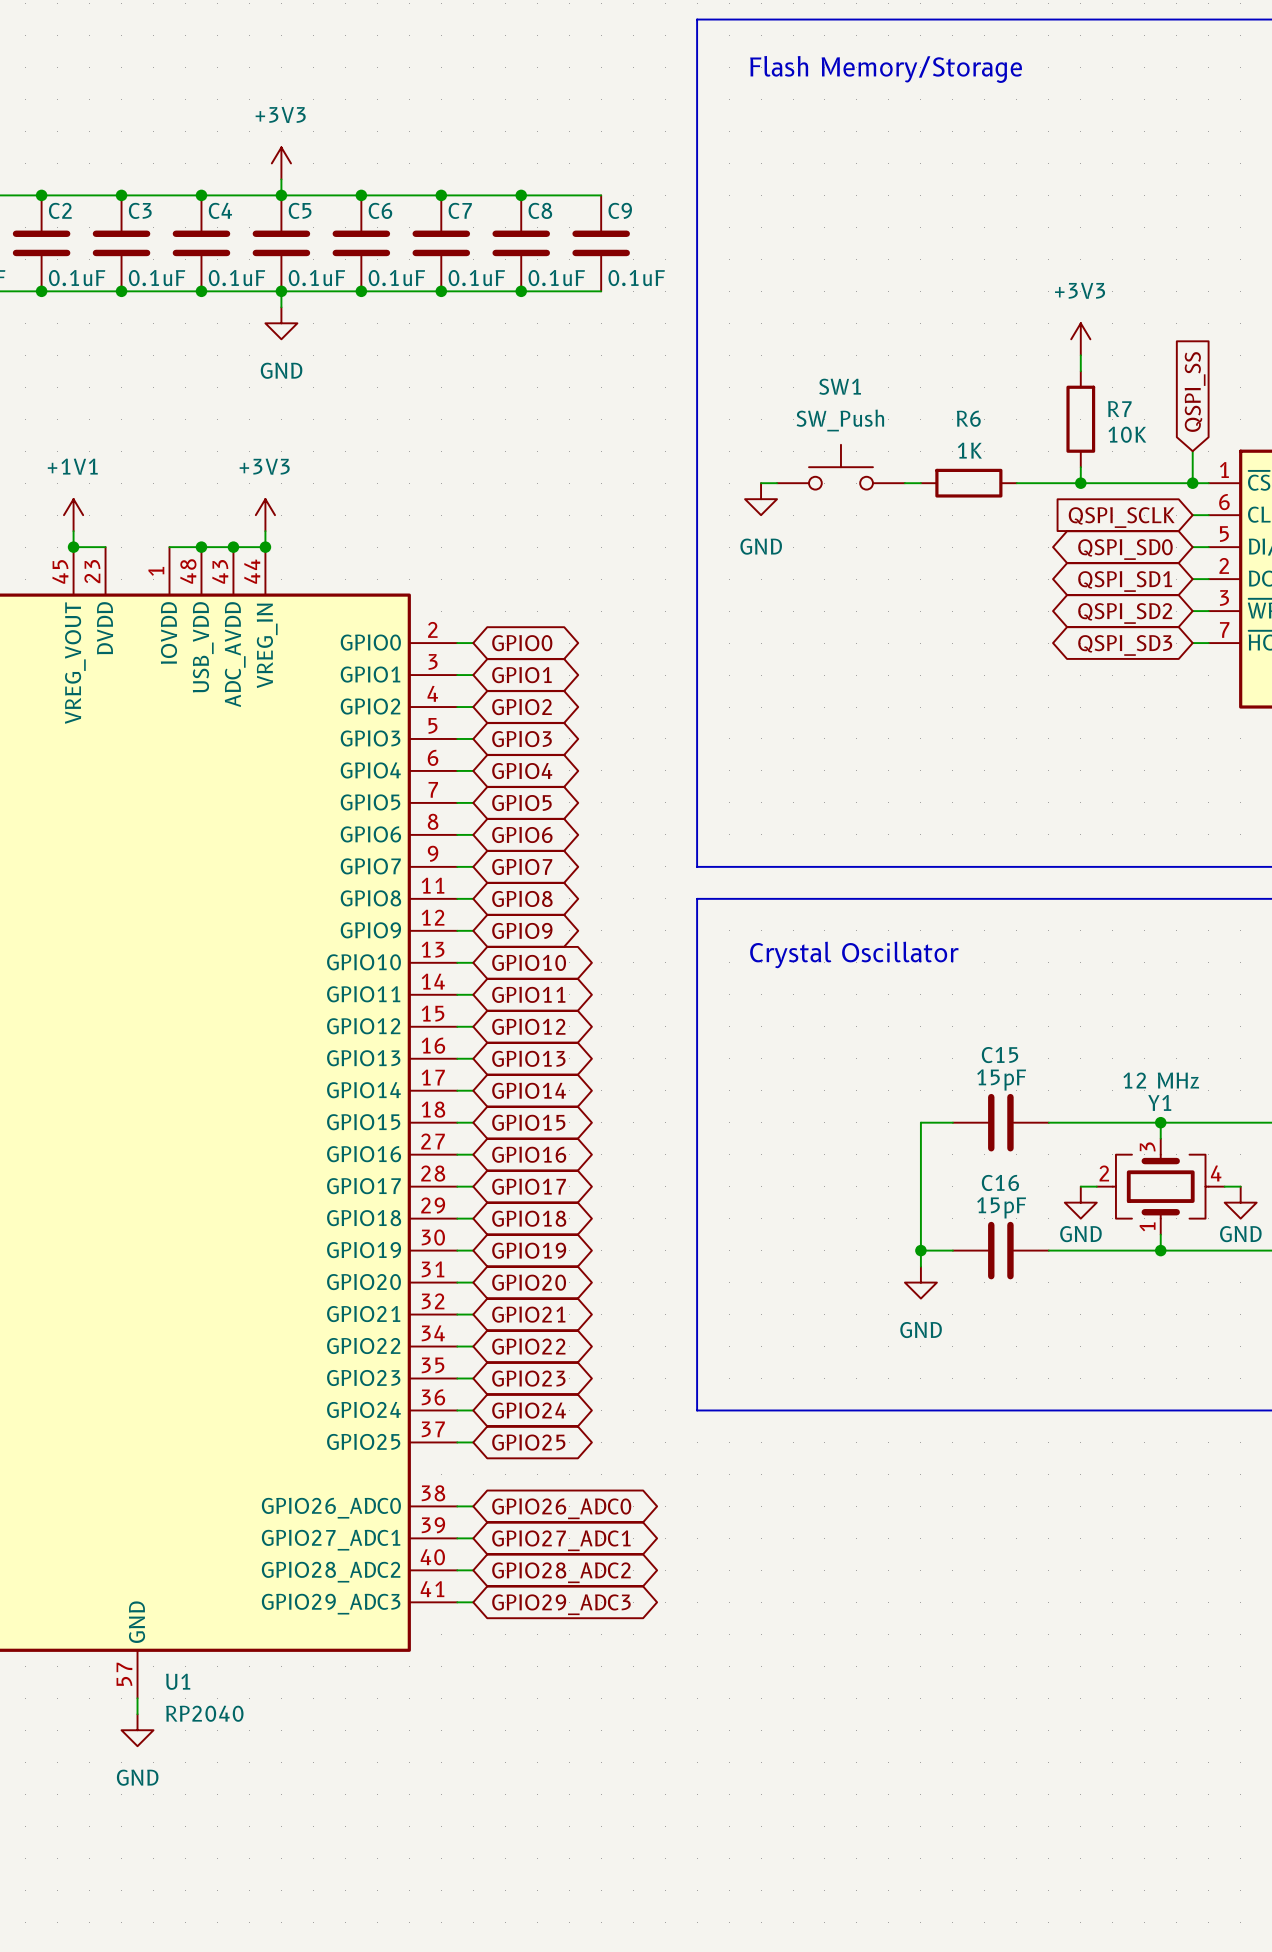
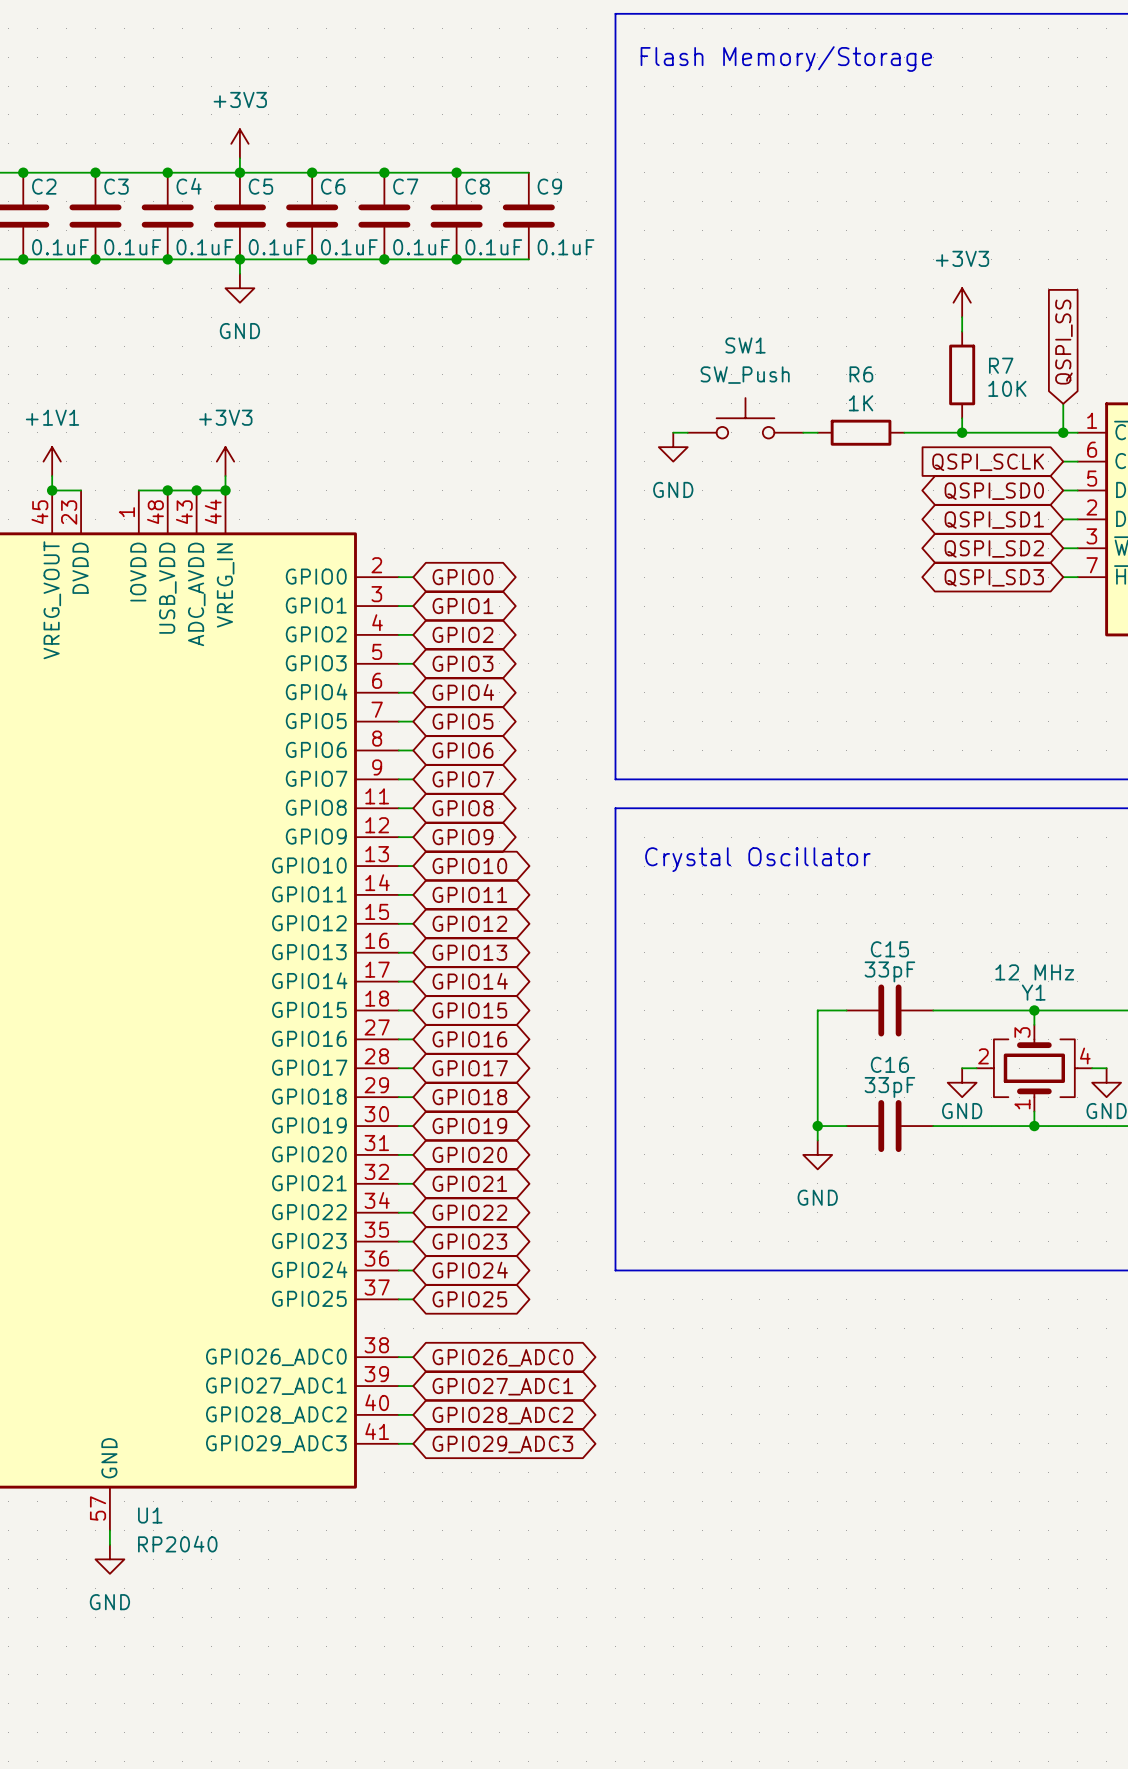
C15 value: 15pF (1001, 1079) -> 33pF (889, 971)
C16 value: 15pF (1001, 1207) -> 33pF (889, 1087)

